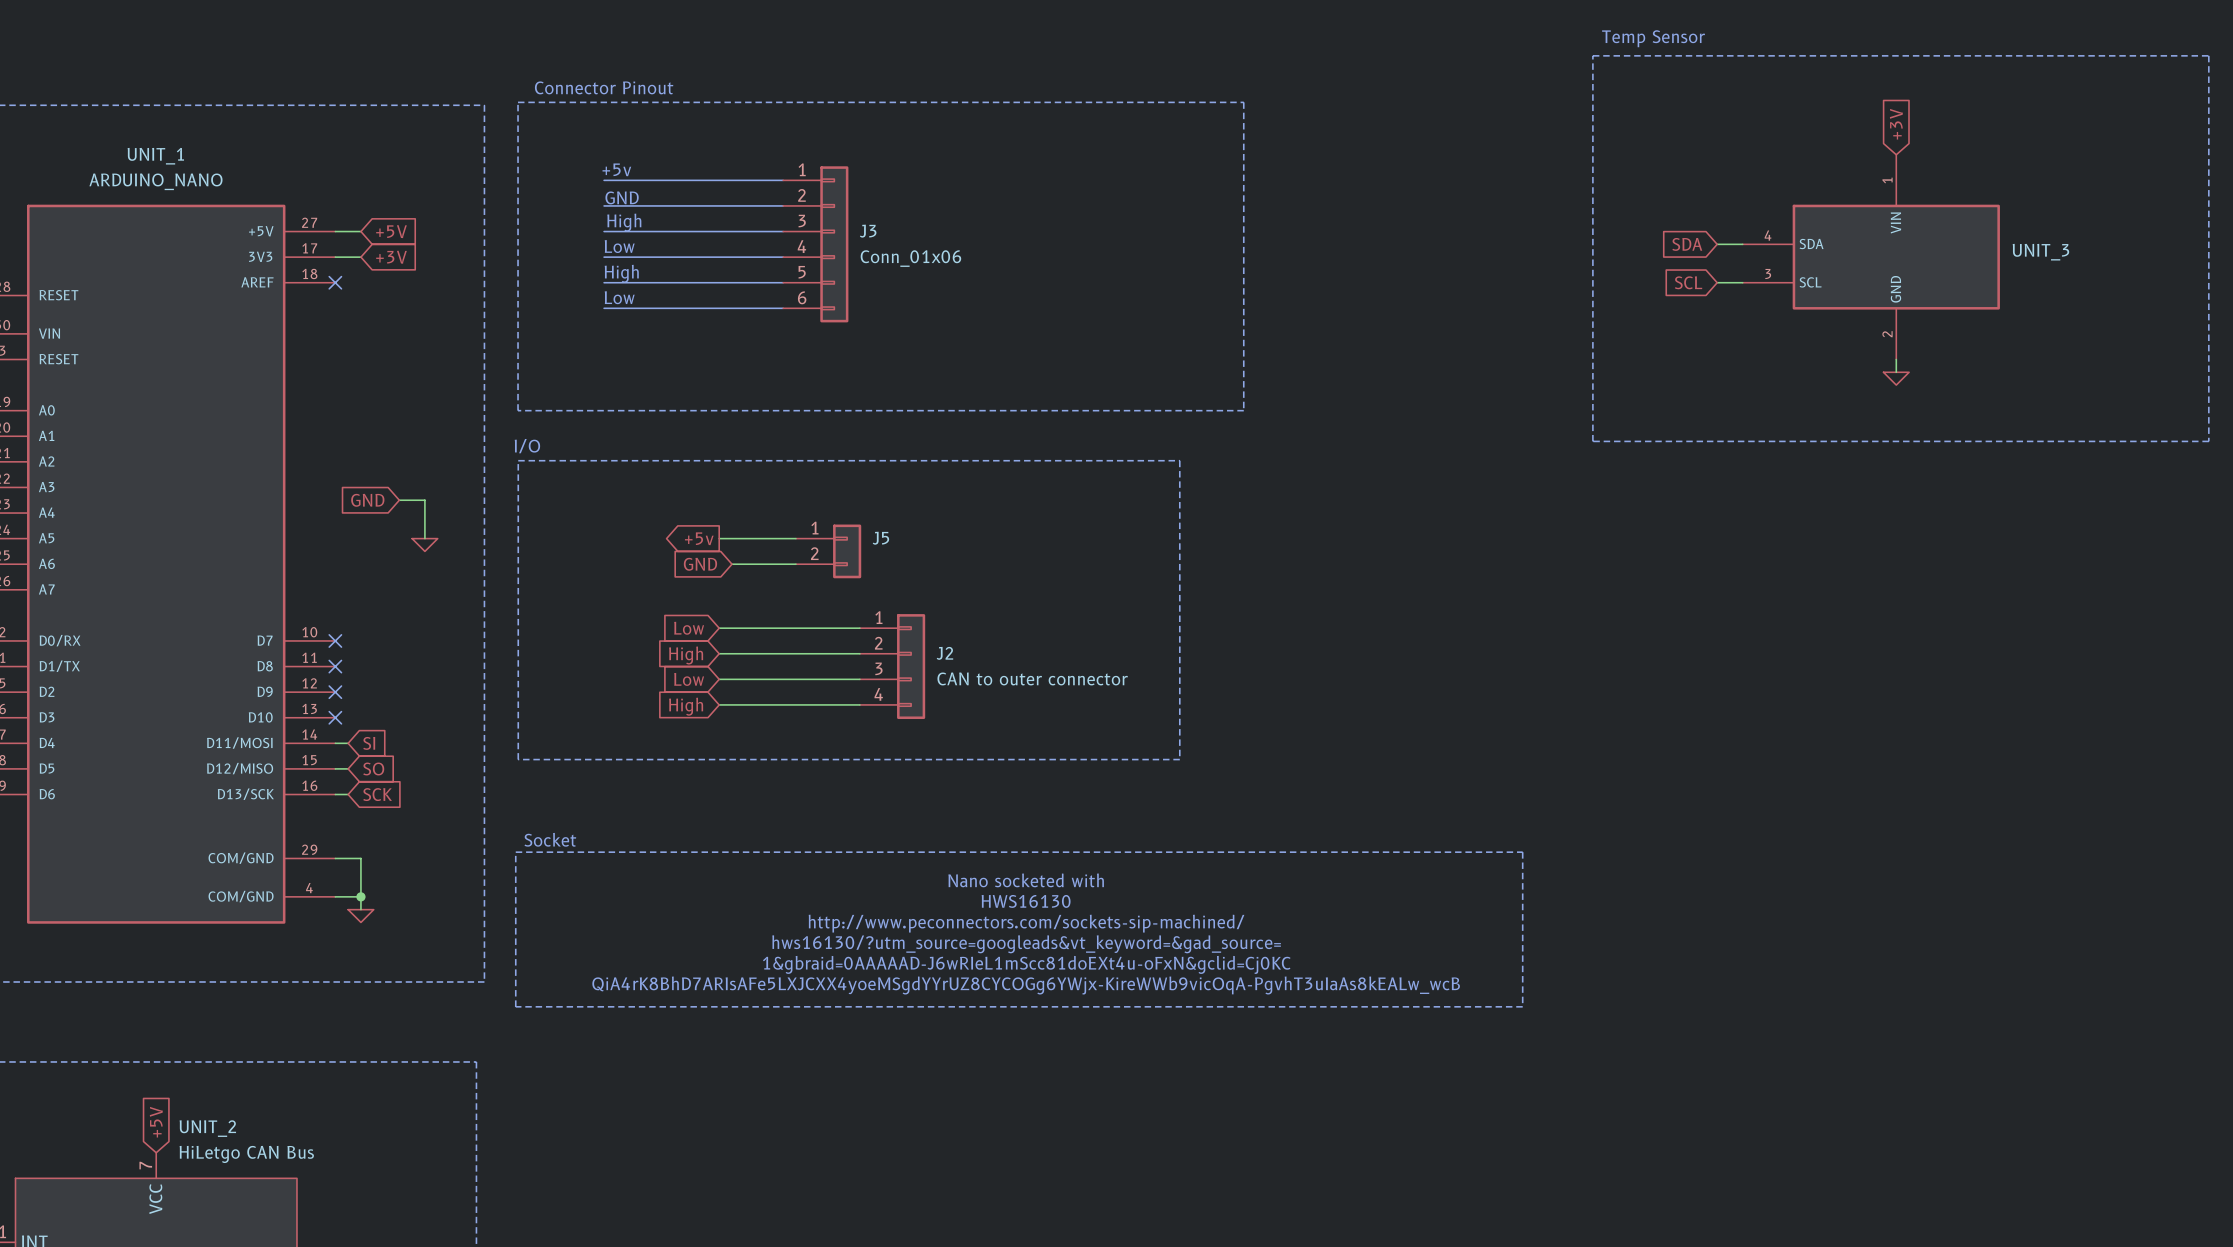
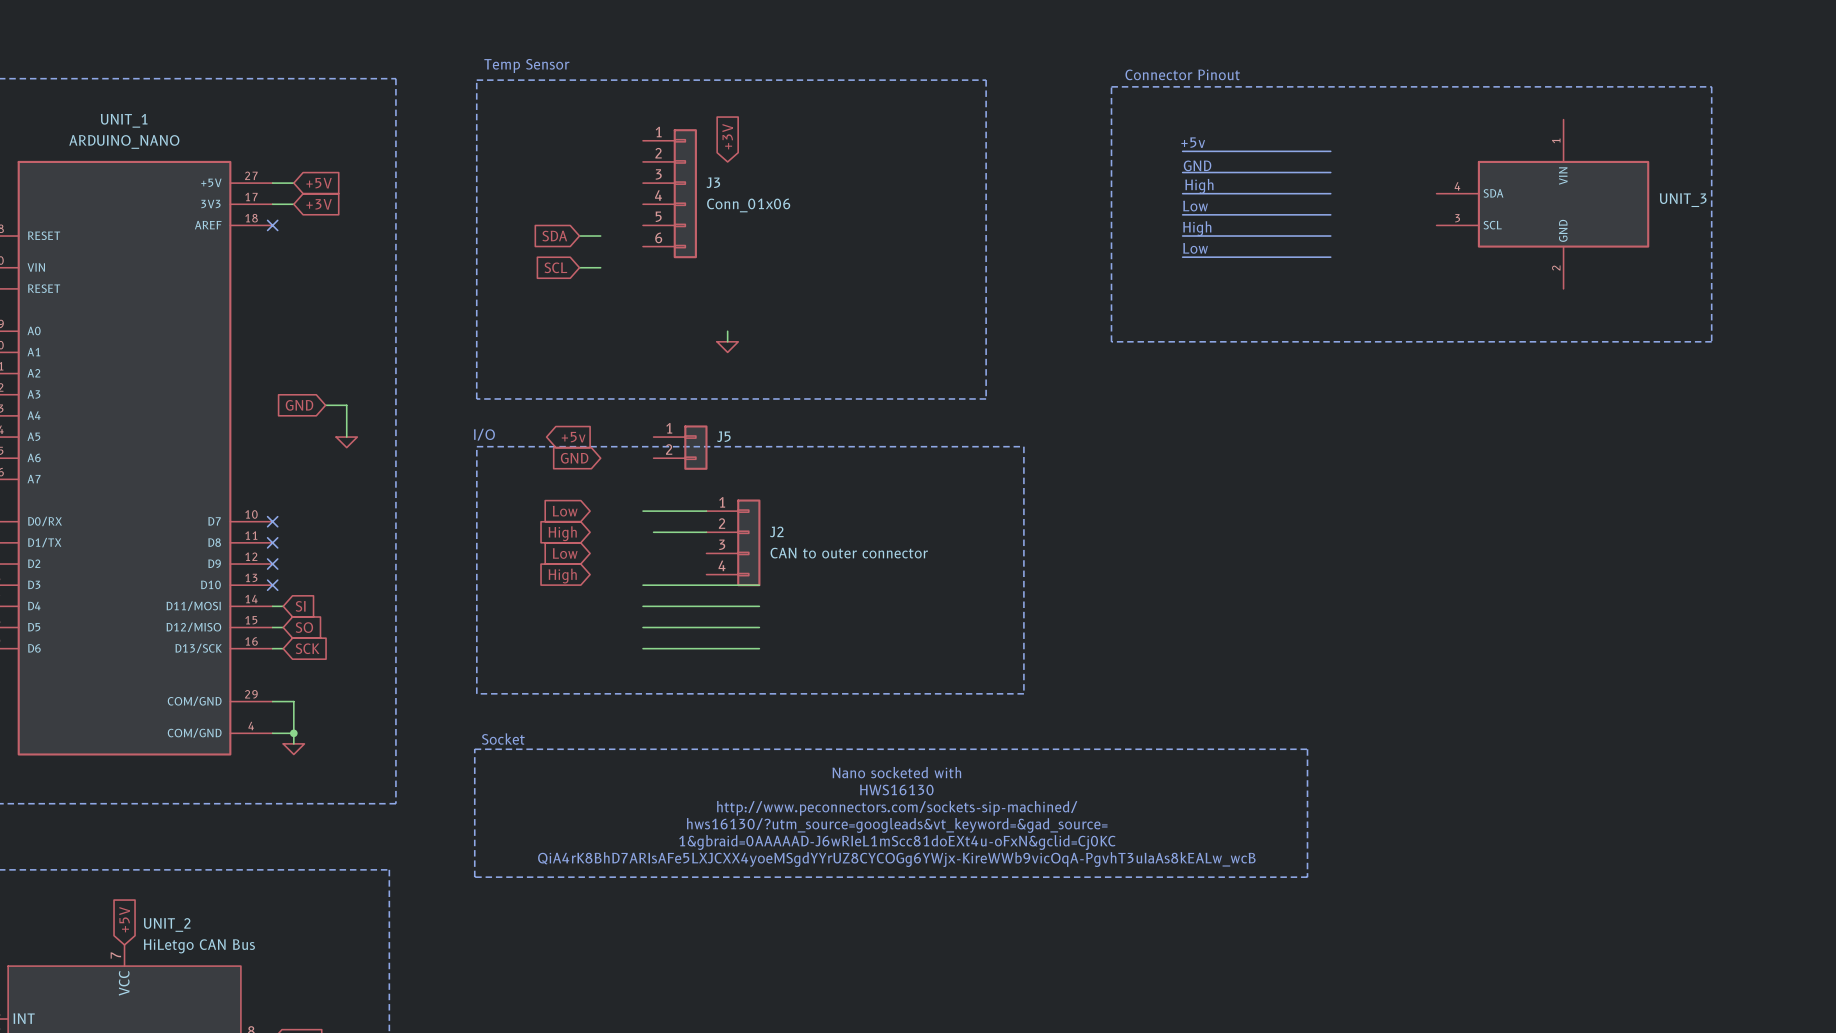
text: Temp Sensor (1653, 38) -> none
line: (1592, 55) (2208, 55) (2208, 441) (1592, 441) (1592, 55) -> none
text: Connector Pinout (604, 87) -> none
text: none -> Temp Sensor (526, 65)
text: none -> Connector Pinout (1182, 74)
line: (518, 102) (1243, 102) (1243, 410) (518, 410) (518, 102) -> (476, 80) (476, 398) (986, 398) (986, 80) (476, 80)
line: none -> (1111, 86) (1711, 86) (1711, 341) (1111, 341) (1111, 86)
global label: +3V (1896, 124) -> none
text: +5v (616, 169) -> none
global label: none -> +3V (727, 136)
line: (604, 180) (783, 180) -> none
text: none -> +5v (1193, 142)
line: none -> (1182, 151) (1330, 151)
text: GND (622, 197) -> none
line: (604, 205) (783, 205) -> none
text: none -> GND (1197, 165)
line: none -> (1182, 172) (1330, 172)
text: High (624, 222) -> none
line: (604, 231) (783, 231) -> none
text: none -> High (1199, 186)
line: none -> (1182, 193) (1330, 193)
global label: SDA (1687, 244) -> none
wire: (1717, 244) (1742, 244) -> none
text: Low (619, 246) -> none
line: (604, 257) (783, 257) -> none
text: none -> Low (1195, 206)
line: none -> (1182, 214) (1330, 214)
text: High (621, 273) -> none
line: (604, 282) (783, 282) -> none
global label: SCL (1688, 282) -> none
wire: (1717, 282) (1742, 282) -> none
text: none -> High (1197, 228)
global label: none -> SDA (554, 236)
wire: none -> (579, 236) (600, 236)
line: none -> (1182, 236) (1330, 236)
text: Low (619, 297) -> none
line: (604, 308) (783, 308) -> none
text: none -> Low (1195, 248)
line: none -> (1182, 257) (1330, 257)
global label: none -> SCL (555, 267)
wire: none -> (579, 267) (600, 267)
wire: (1896, 359) (1896, 372) -> none
power symbol: (1896, 378) -> none
wire: none -> (727, 331) (727, 341)
power symbol: none -> (727, 347)
text position: I/O (527, 446) -> I/O (484, 434)
line: (518, 460) (1179, 460) (1179, 759) (518, 759) (518, 460) -> (476, 446) (1023, 446) (1023, 693) (476, 693) (476, 446)
wire: (719, 538) (795, 538) -> none
wire: (731, 564) (795, 564) -> none
wire: (719, 628) (783, 628) -> none
wire: (719, 653) (795, 653) -> none
wire: (719, 679) (859, 679) -> (643, 585) (759, 585)
wire: (719, 704) (859, 704) -> (643, 606) (759, 606)
wire: none -> (643, 627) (759, 627)
wire: none -> (643, 648) (759, 648)
text position: Socket (550, 839) -> Socket (503, 739)
line: (515, 852) (1522, 852) (1522, 1006) (515, 1006) (515, 852) -> (474, 749) (1307, 749) (1307, 877) (474, 877) (474, 749)
text position: Nano socketed with (1026, 880) -> Nano socketed with (896, 772)
text position: HWS16130 (1026, 901) -> HWS16130 (896, 789)
text position: http://www.peconnectors.com/sockets-sip-machined/ (1026, 923) -> http://www.peconnectors.com/sockets-sip-machined/ (897, 808)
text position: hws16130/?utm_source=googleads&vt_keyword=&gad_source= (1026, 944) -> hws16130/?utm_source=googleads&vt_keyword=&gad_source= (897, 825)
text position: 1&gbraid=0AAAAAD-J6wRIeL1mScc81doEXt4u-oFxN&gclid=Cj0KC (1026, 964) -> 1&gbraid=0AAAAAD-J6wRIeL1mScc81doEXt4u-oFxN&gclid=Cj0KC (897, 842)
text position: QiA4rK8BhD7ARIsAFe5LXJCXX4yoeMSgdYYrUZ8CYCOGg6YWjx-KireWWb9vicOqA-PgvhT3uIaAs8kEALw_wcB (1026, 985) -> QiA4rK8BhD7ARIsAFe5LXJCXX4yoeMSgdYYrUZ8CYCOGg6YWjx-KireWWb9vicOqA-PgvhT3uIaAs8kEALw_wcB (896, 859)

